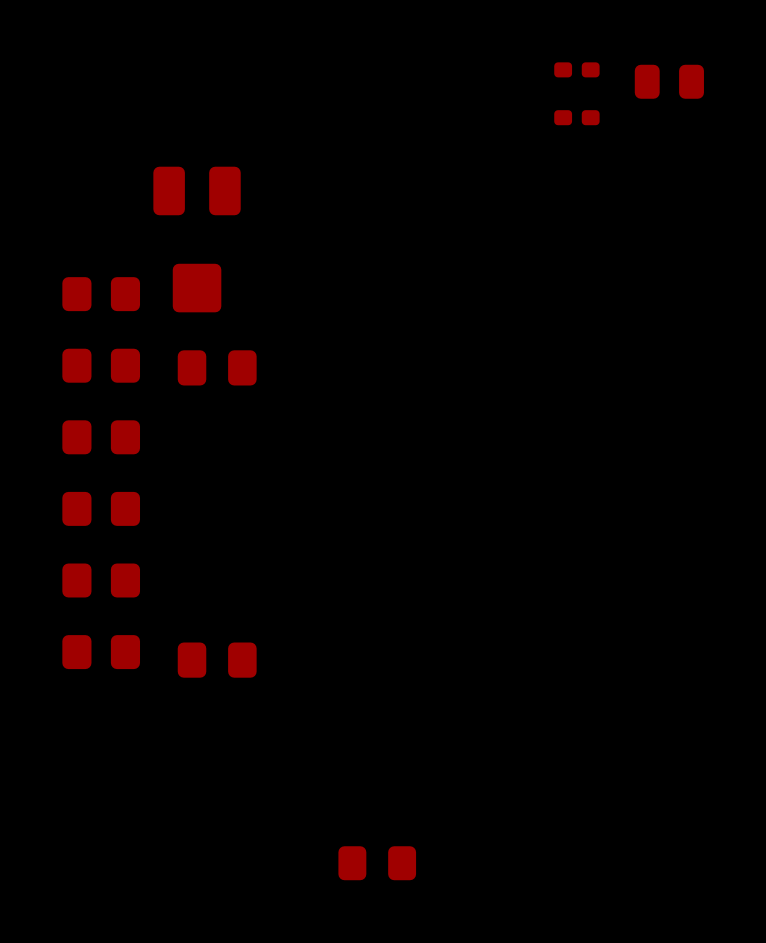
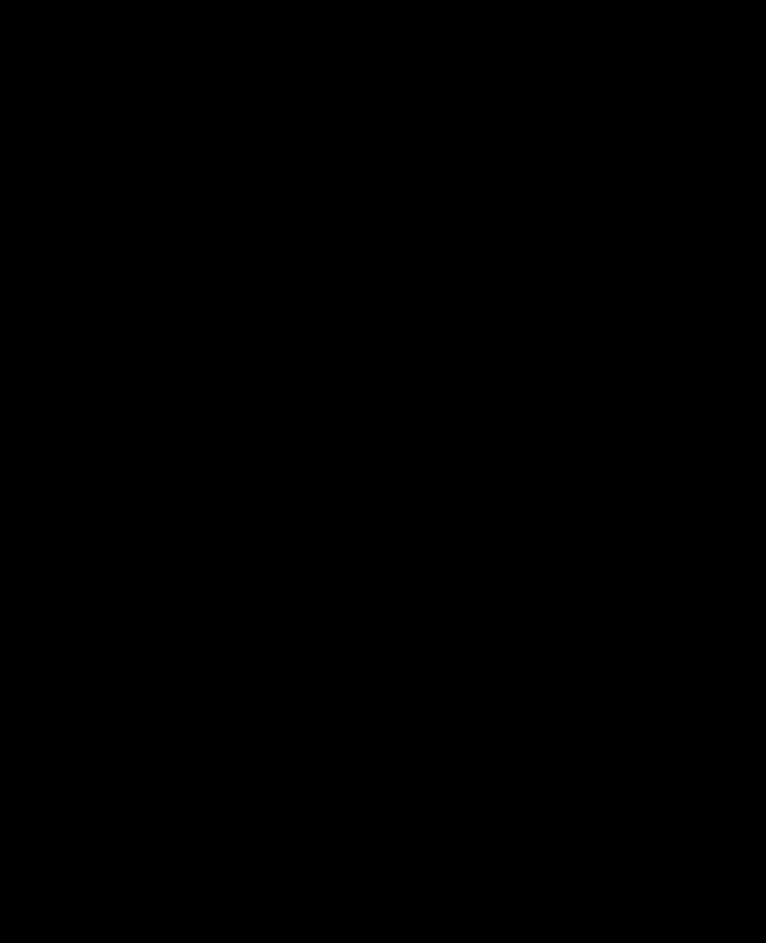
part: (576, 69) -> none
part: (669, 81) -> none
part: (576, 117) -> none
part: (197, 239) -> none
part: (101, 294) -> none
part: (101, 365) -> none
part: (217, 367) -> none
part: (101, 437) -> none
part: (101, 508) -> none
part: (101, 580) -> none
part: (101, 652) -> none
part: (217, 660) -> none
part: (377, 863) -> none

